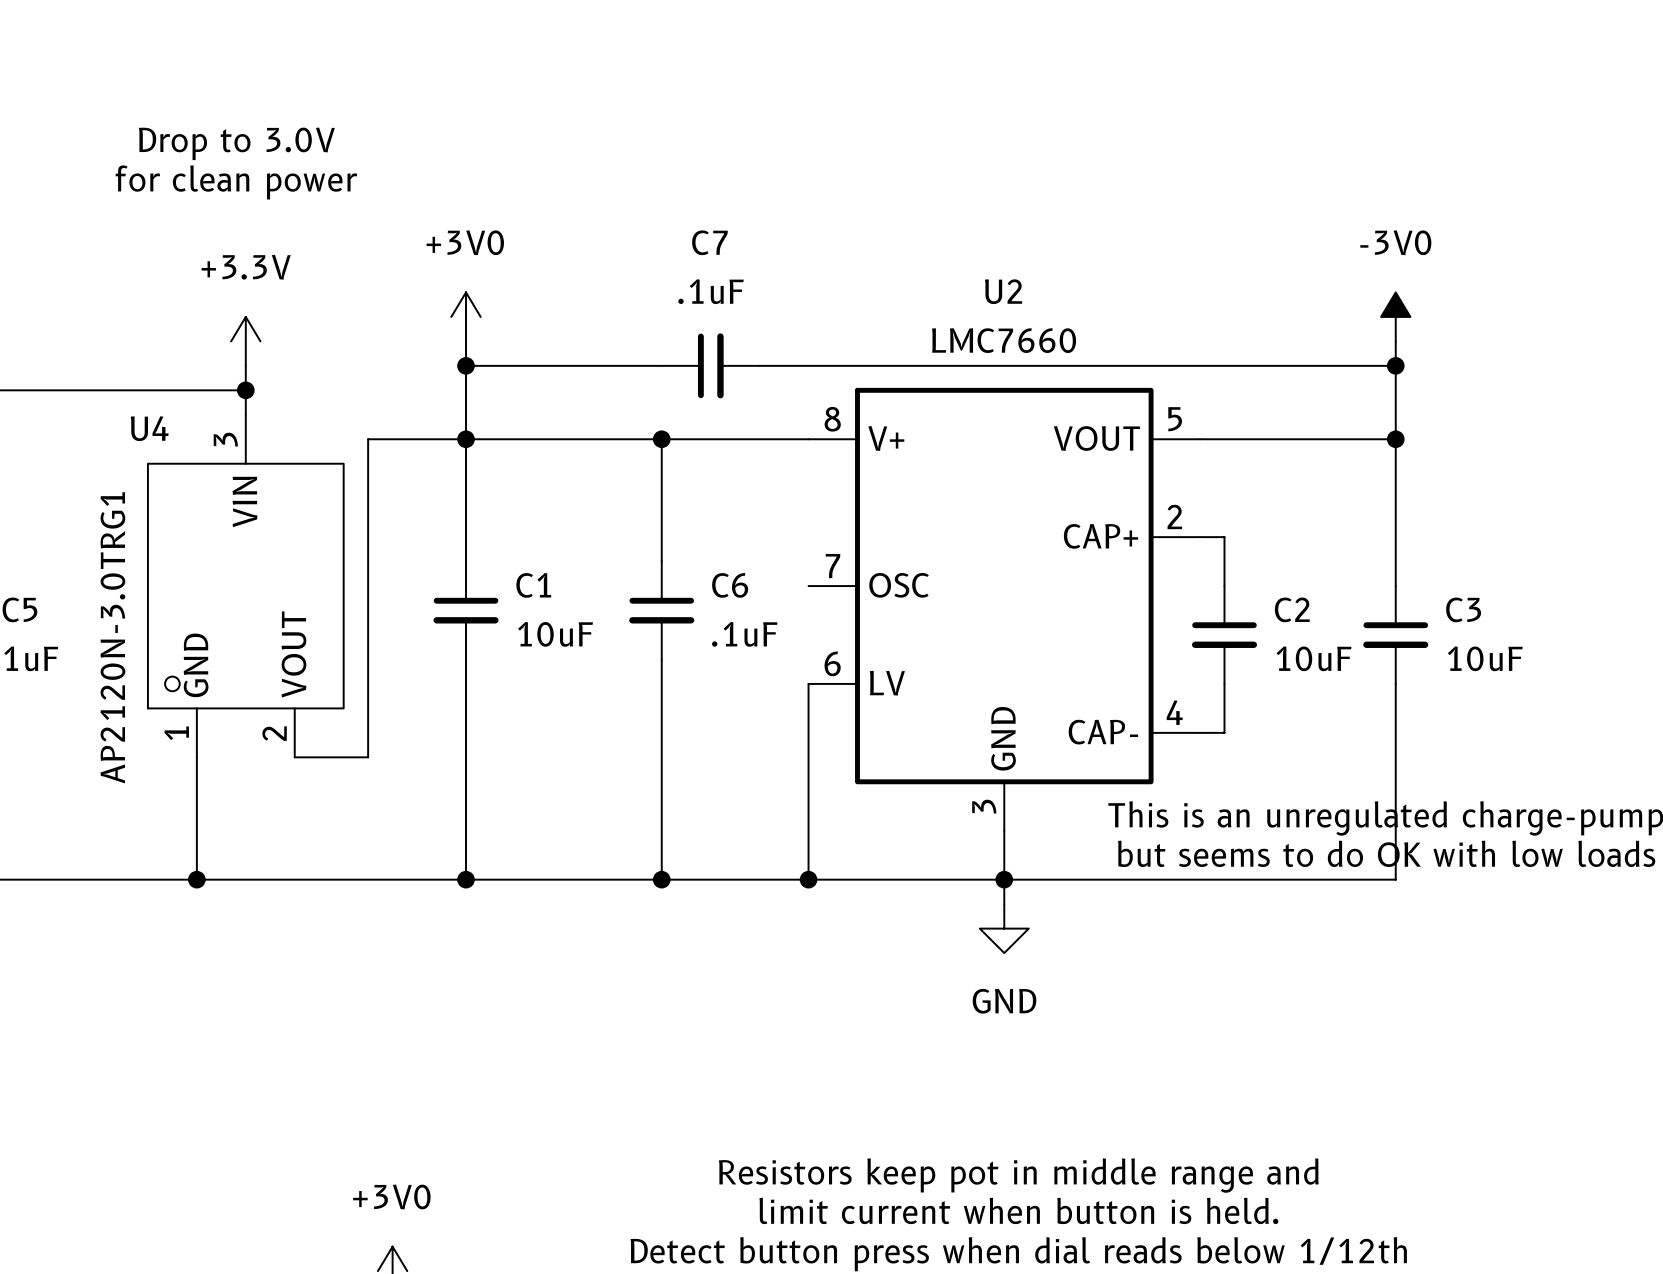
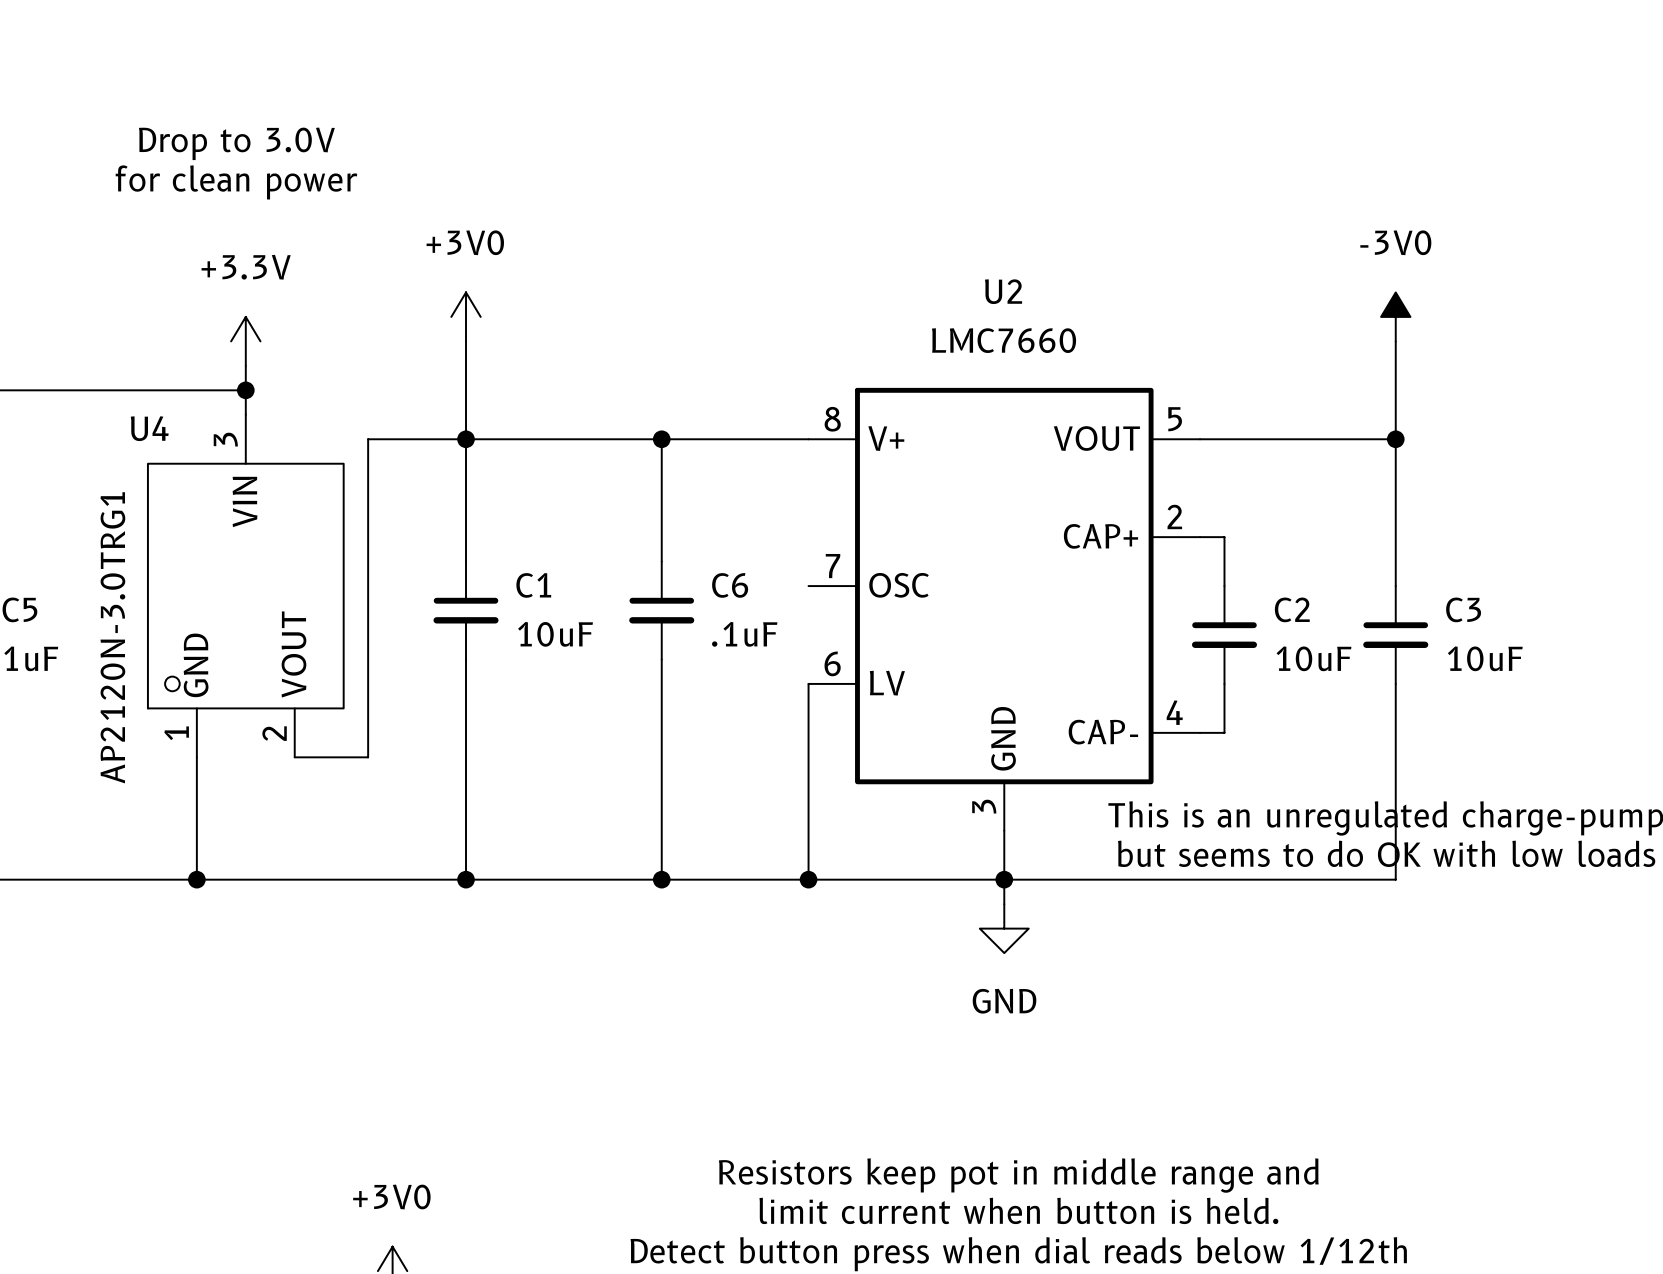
wire: (466, 365) (661, 365) -> none
junction: (466, 365) -> none
C7: .1uF (710, 365) -> none
wire: (759, 365) (1395, 365) -> none
junction: (1395, 365) -> none

